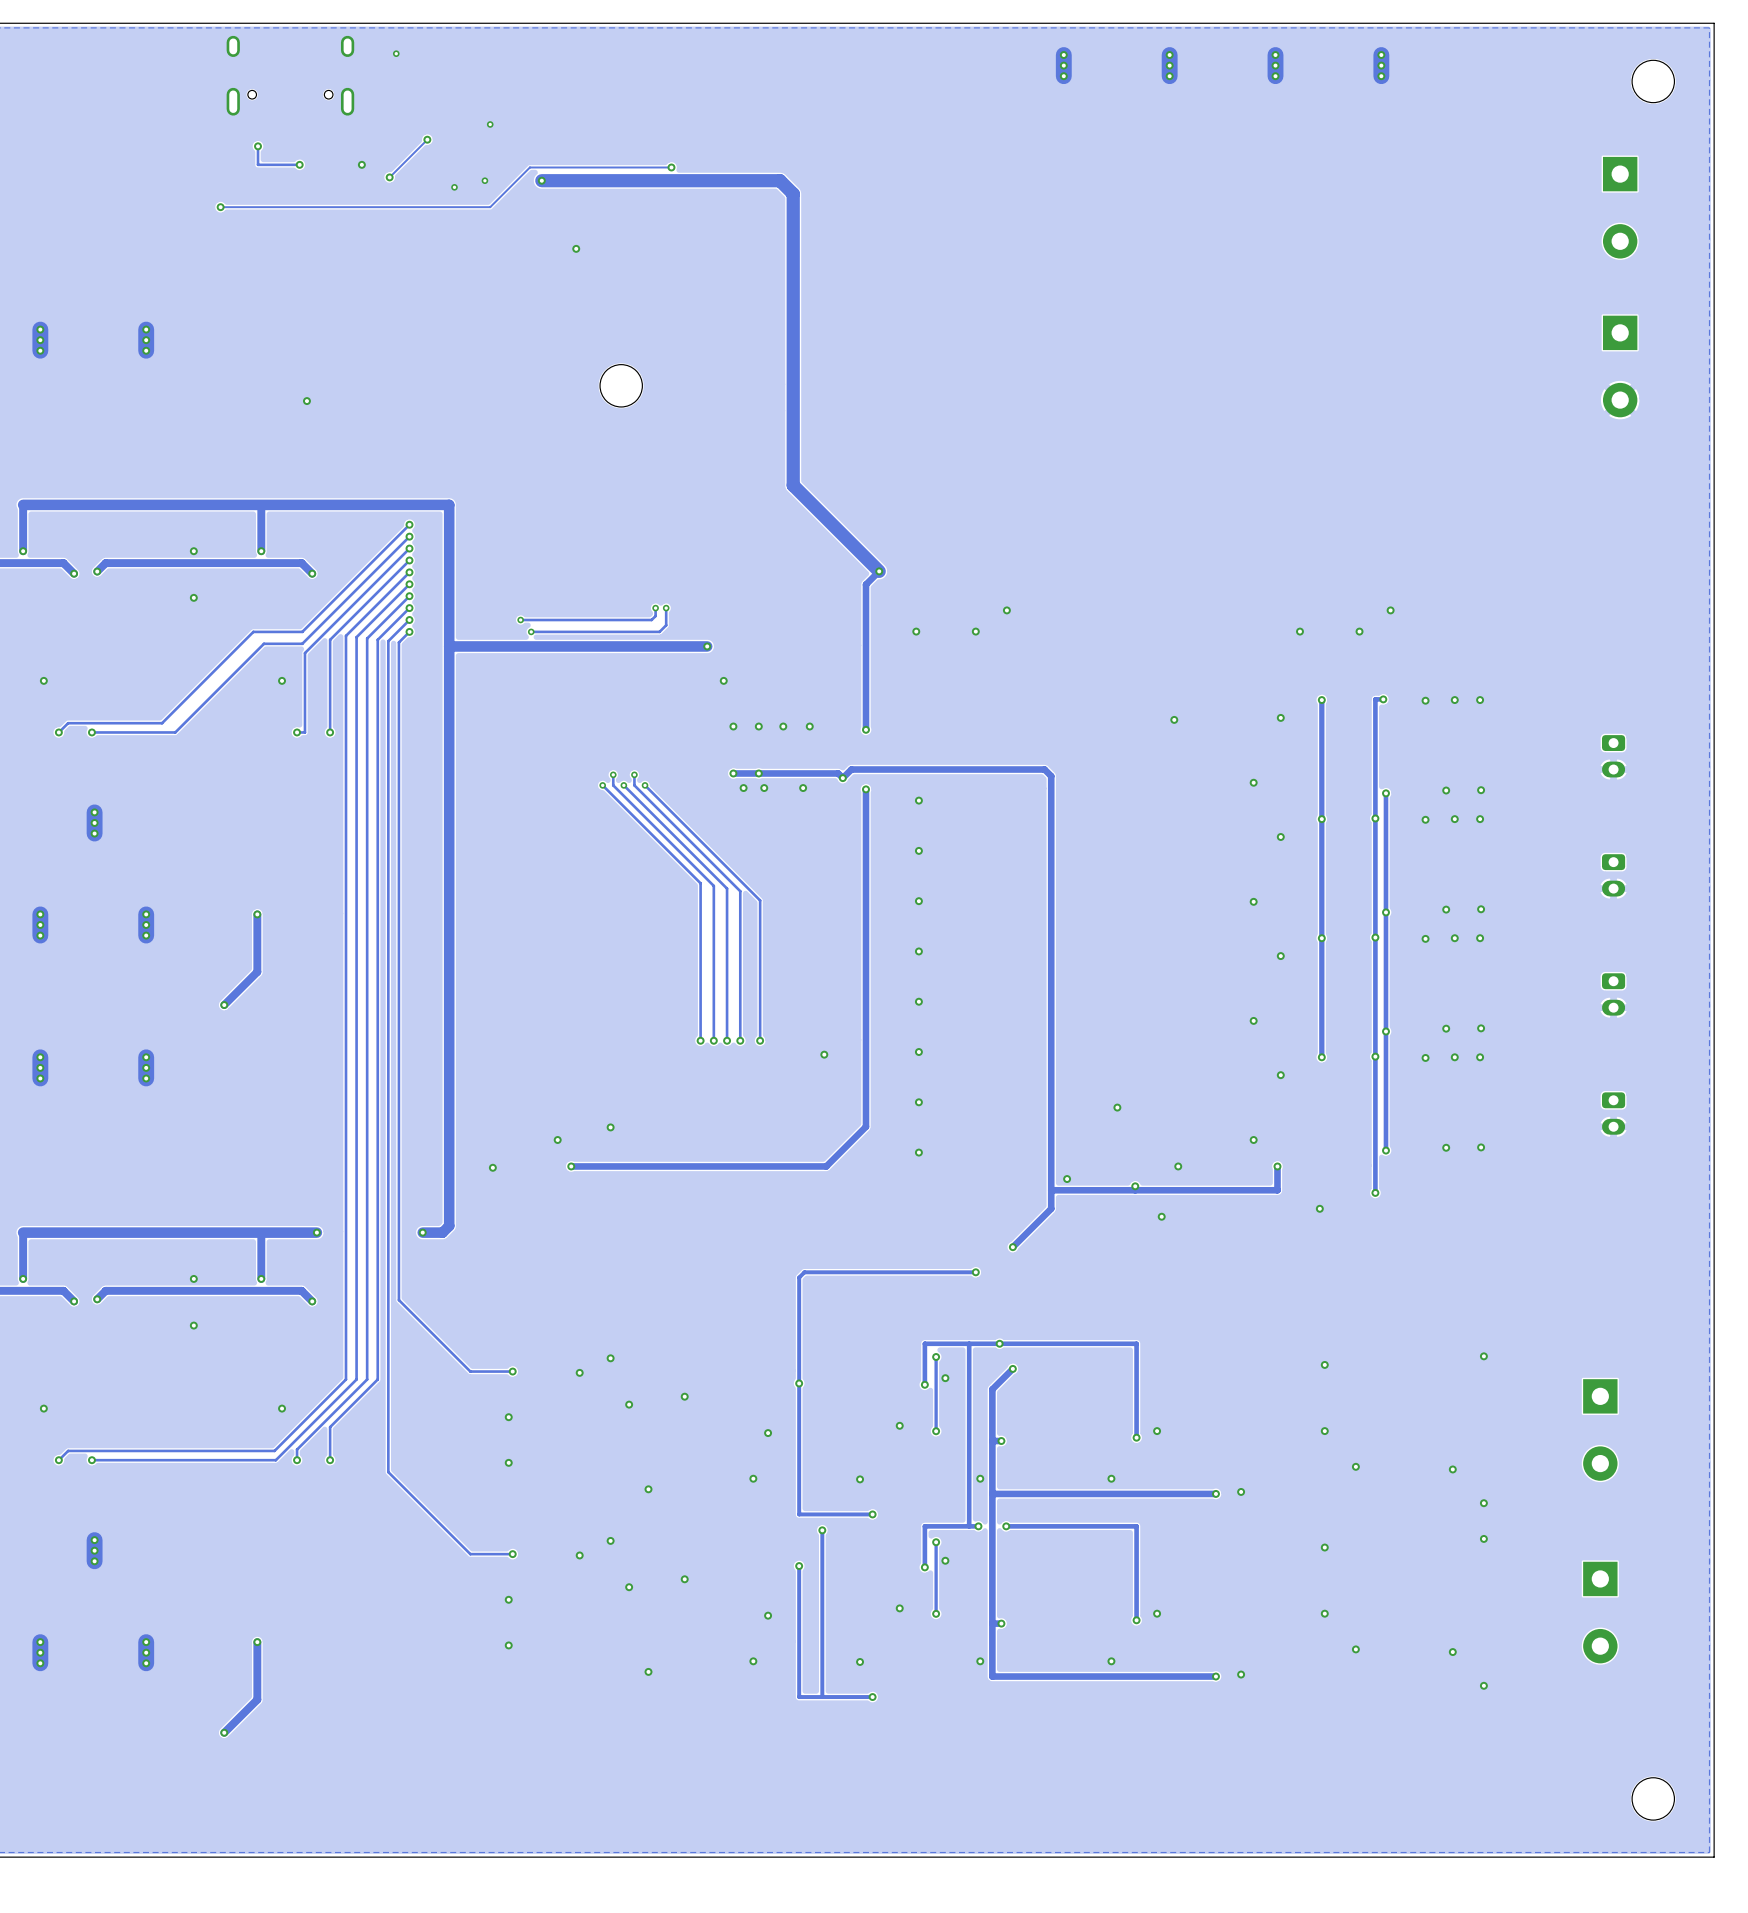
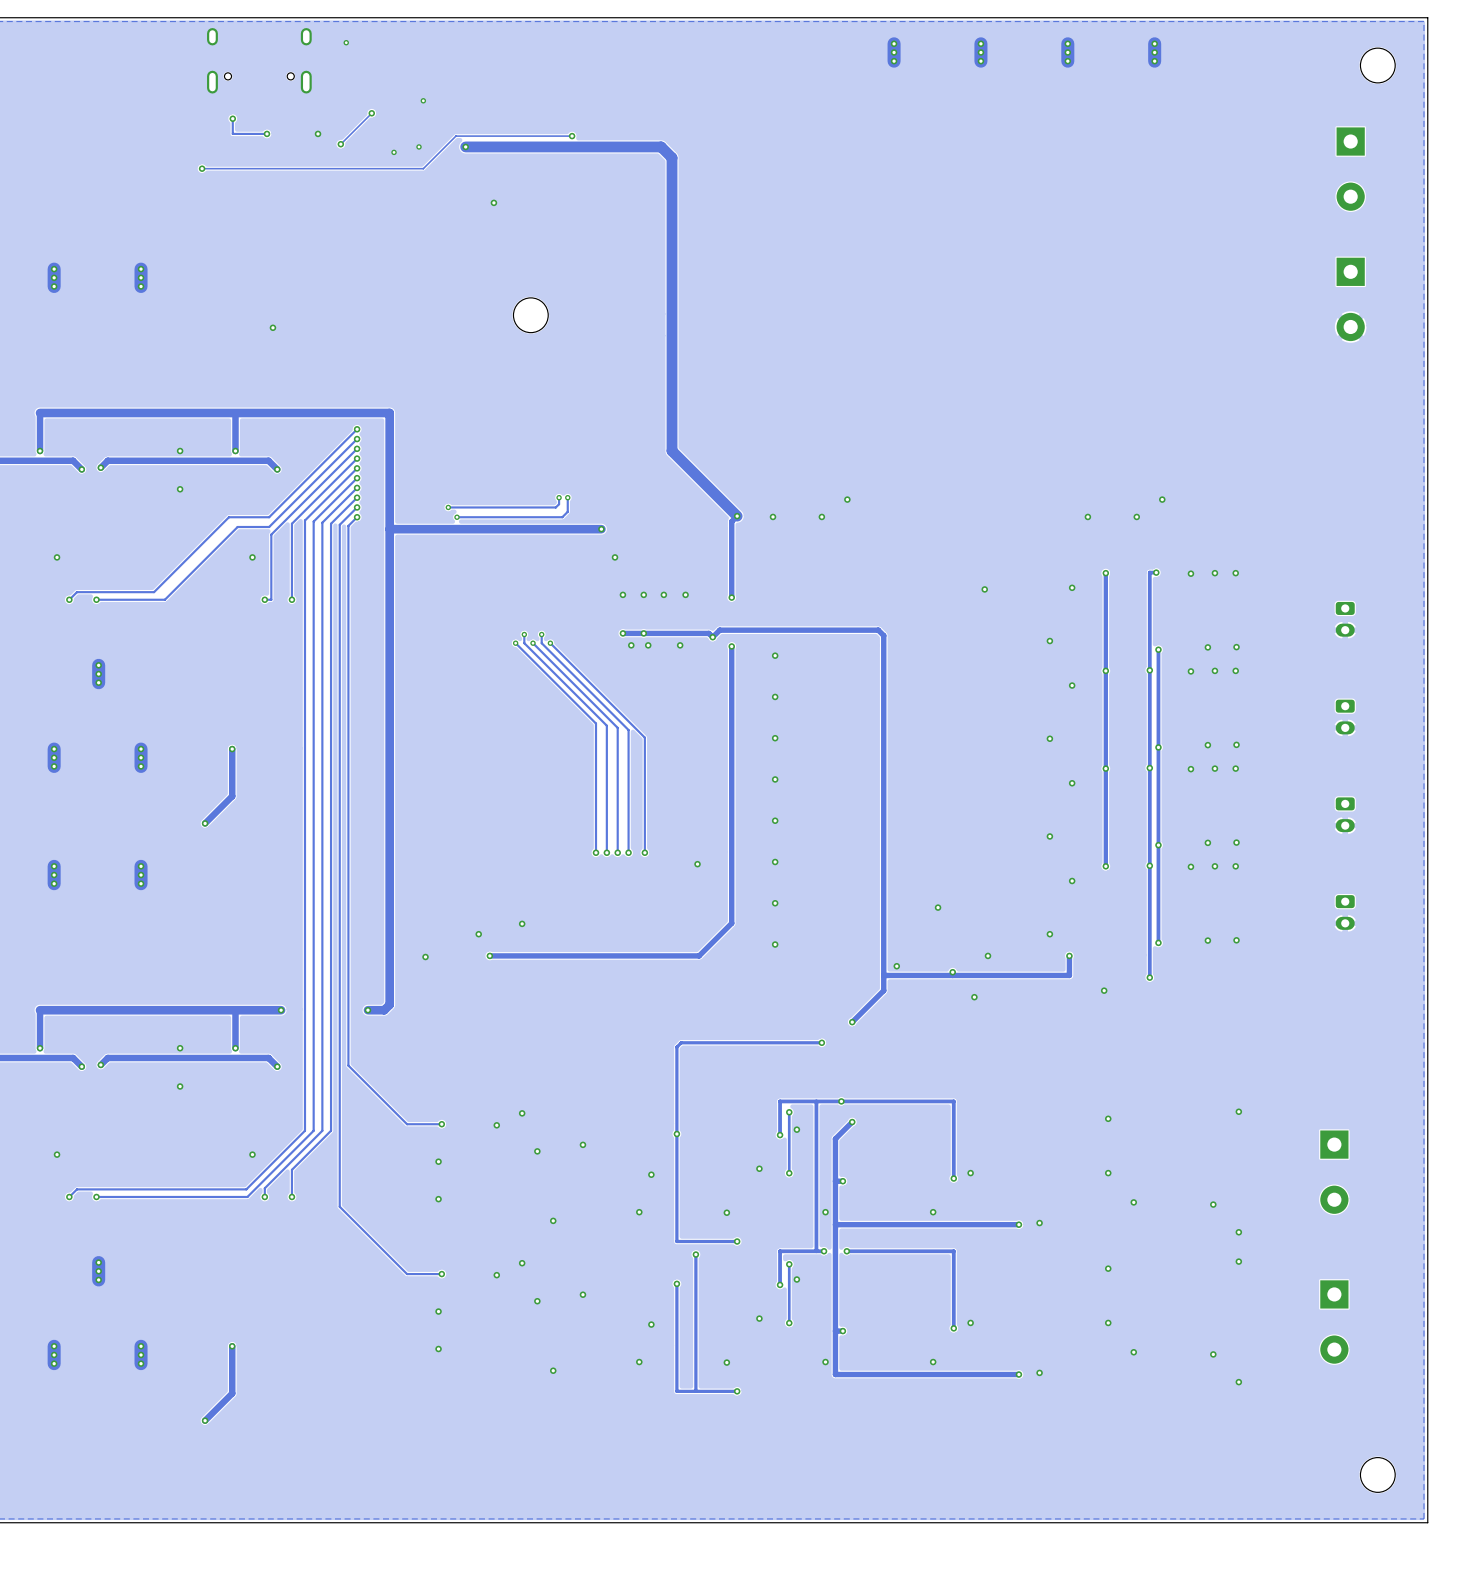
track: (793, 485) (879, 571) (865, 584) (865, 637) -> (672, 396) (672, 450) (737, 516) (731, 521)
via position: (879, 571) -> (737, 516)

